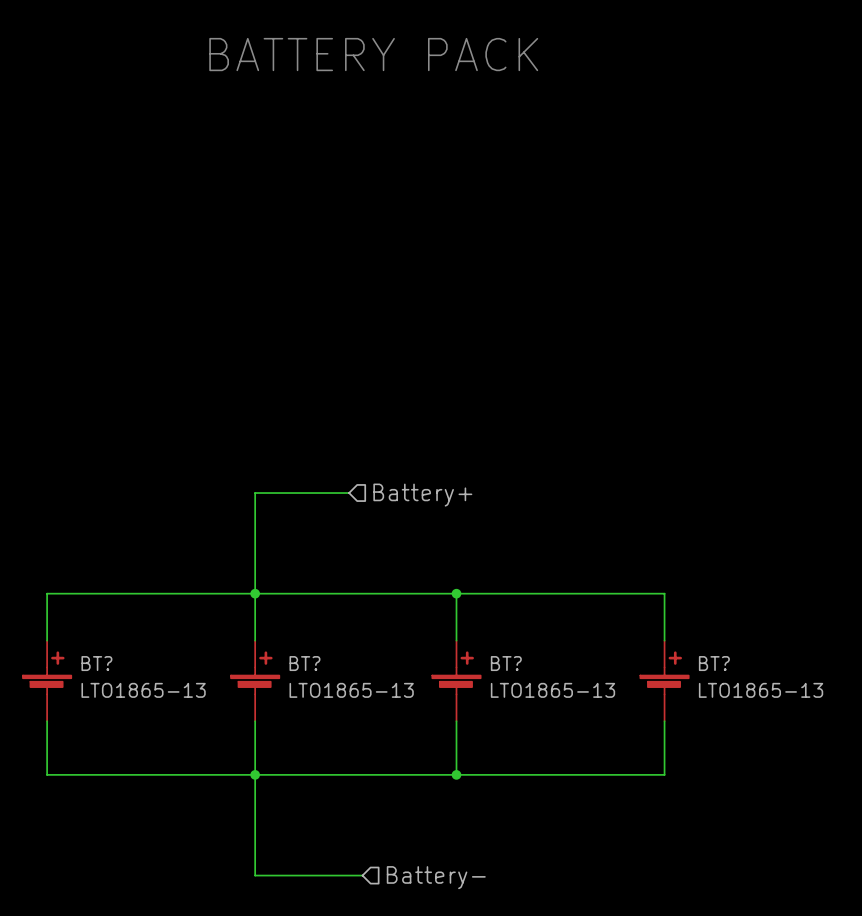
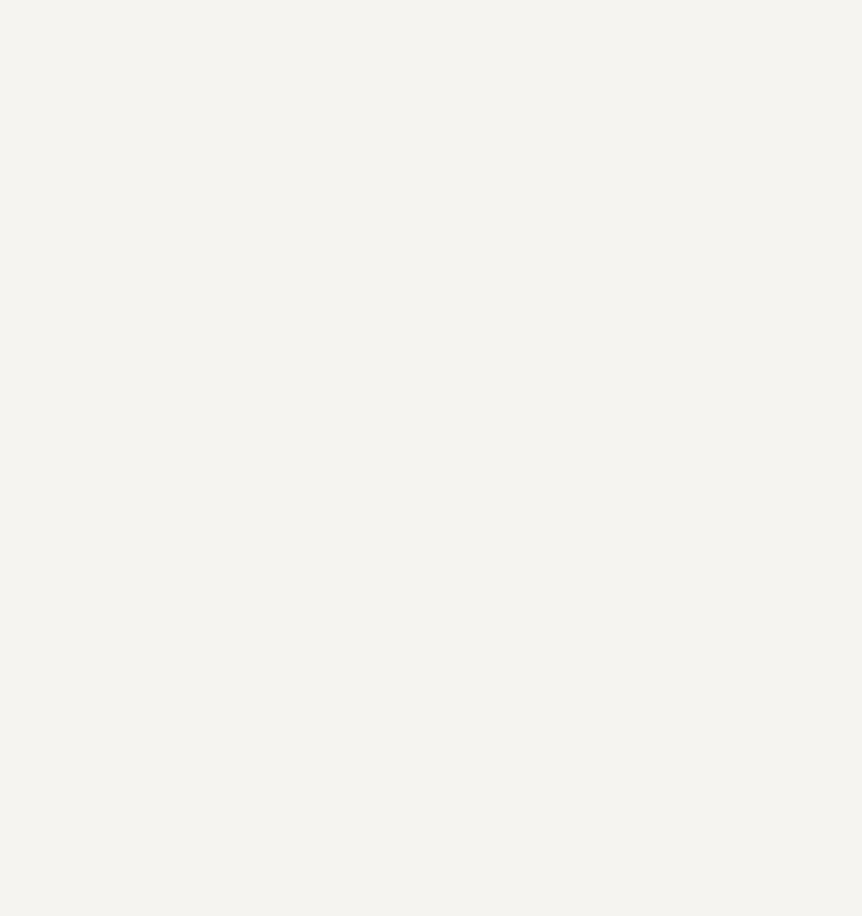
text: BATTERY PACK (373, 54) -> none
wire: (349, 493) (255, 493) (255, 640) -> none
hierarchical label: Battery+ (422, 495) -> none
junction: (255, 593) -> none
wire: (456, 593) (456, 640) -> none
junction: (456, 593) -> none
wire: (47, 640) (47, 593) (664, 593) (664, 640) -> none
BT?: LTO1865-13 (47, 680) -> none
BT?: LTO1865-13 (255, 680) -> none
BT?: LTO1865-13 (456, 680) -> none
BT?: LTO1865-13 (664, 680) -> none
wire: (47, 721) (47, 774) (664, 774) (664, 721) -> none
wire: (255, 721) (255, 875) (362, 875) -> none
wire: (456, 721) (456, 774) -> none
junction: (255, 774) -> none
junction: (456, 774) -> none
hierarchical label: Battery- (436, 877) -> none

